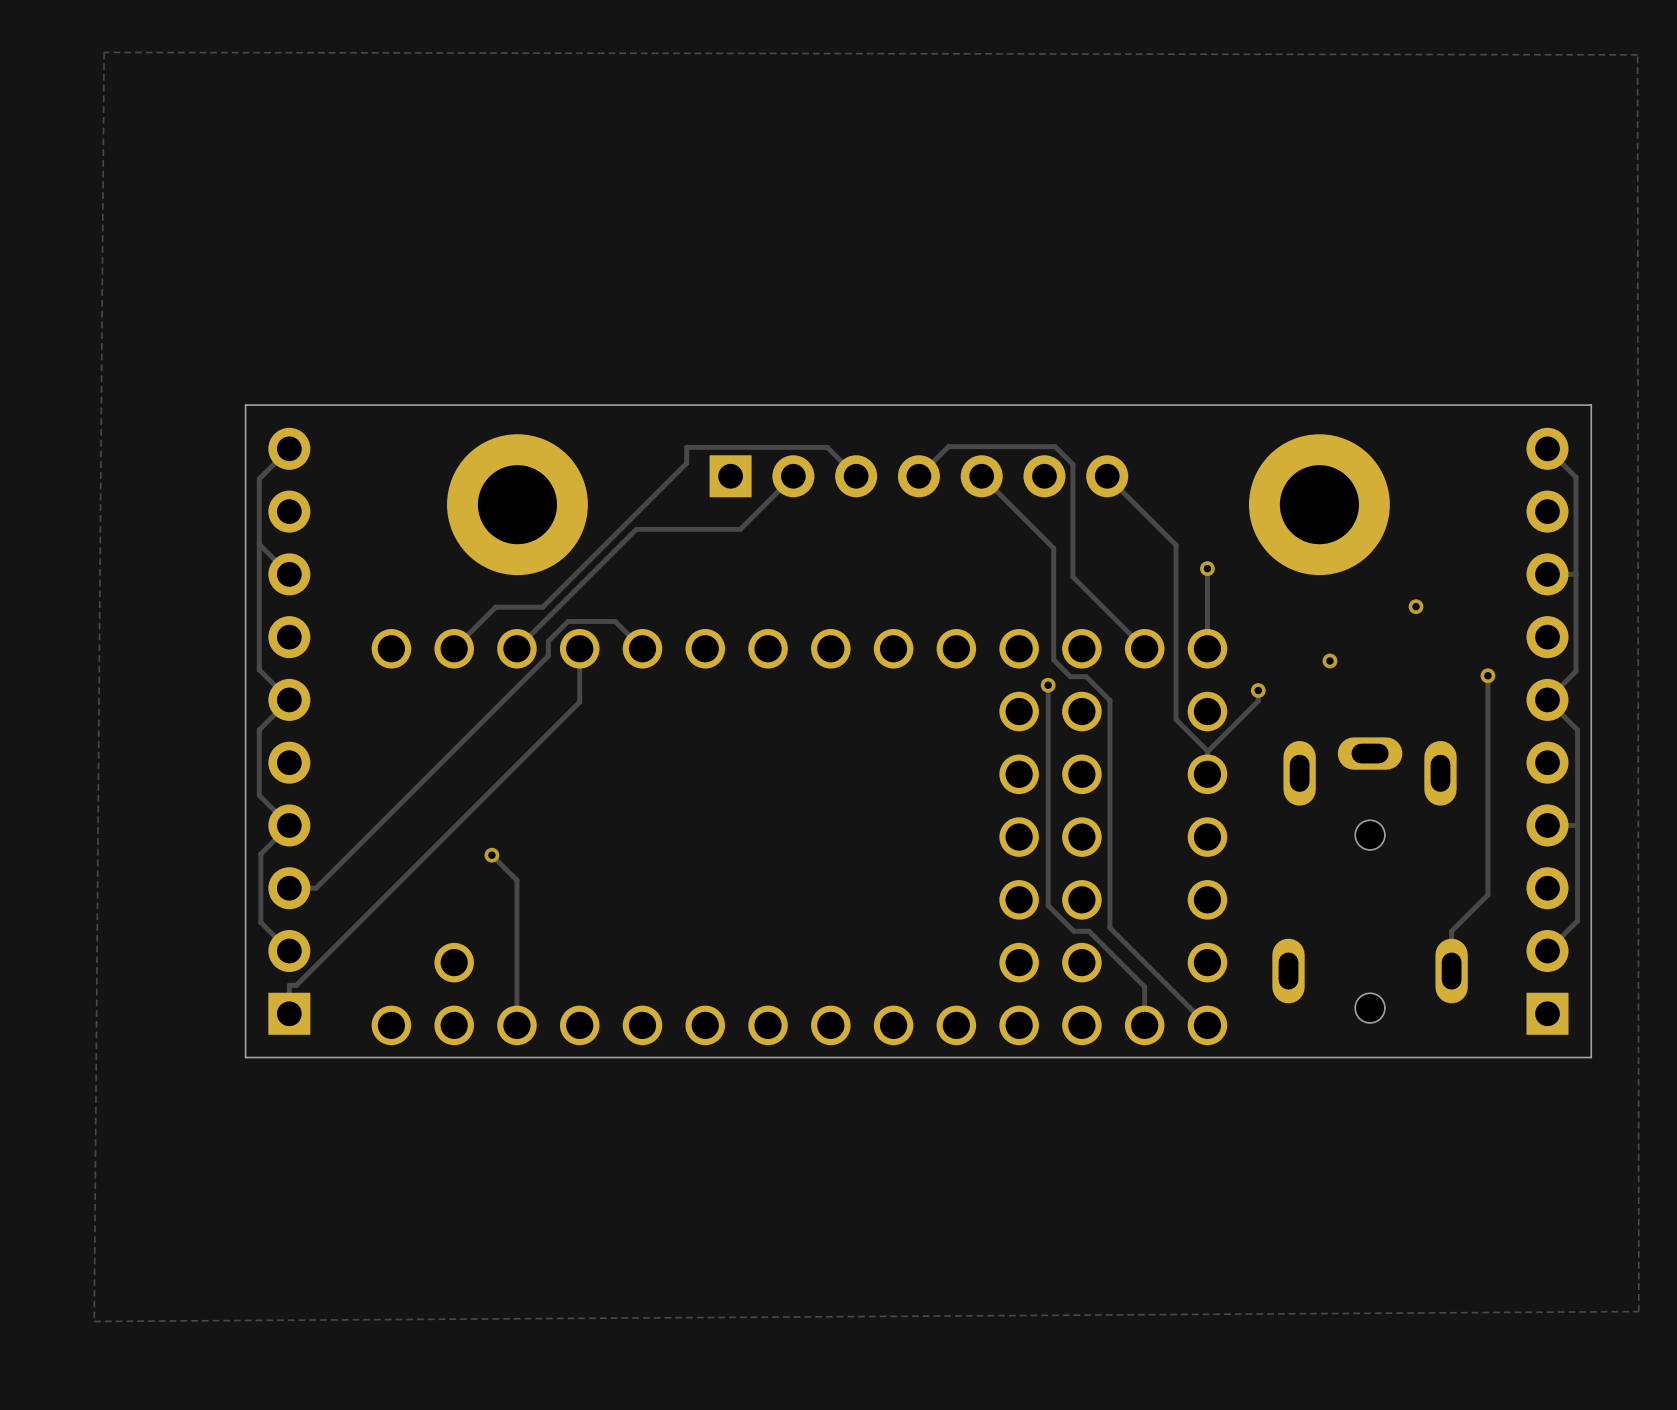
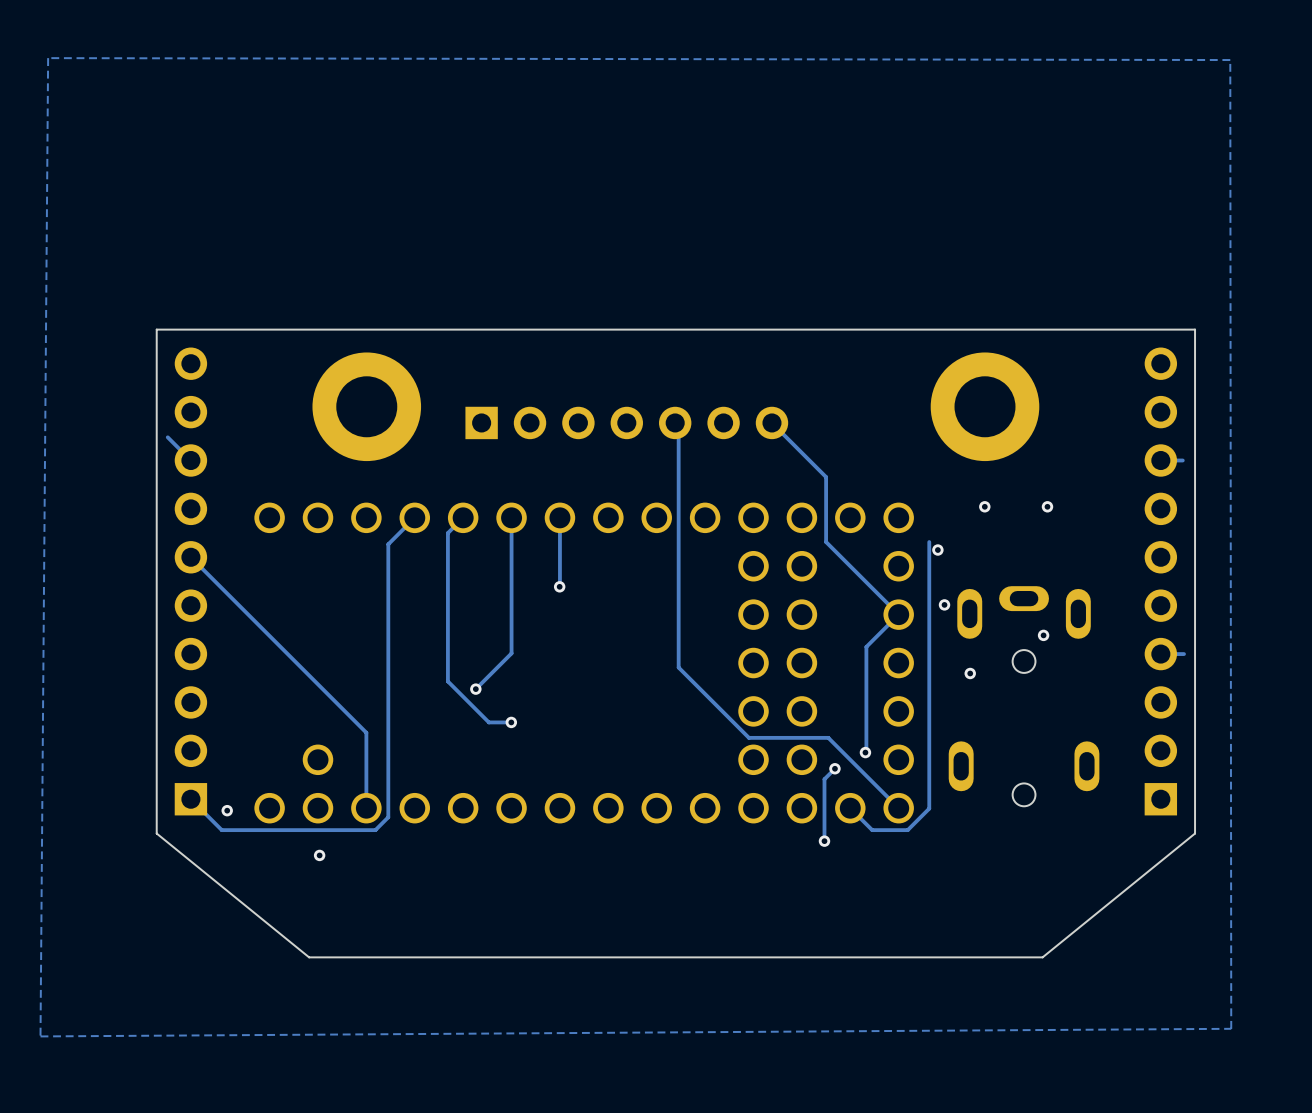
board edge: (1591, 405) (245, 405) (245, 1057) (1591, 1057) (1591, 405) -> (1195, 329) (1195, 833) (1042, 957) (309, 957) (156, 833) (156, 329) (1195, 329)
track: (289, 448) (259, 478) (259, 669) (289, 699) (259, 729) (259, 795) (289, 825) (260, 853) (260, 922) (289, 951) -> none
track: (1547, 448) (1575, 477) (1575, 671) (1547, 699) (1577, 729) (1577, 920) (1547, 951) -> none
track: (793, 476) (740, 529) (636, 529) (516, 648) -> none
track: (856, 476) (827, 447) (686, 447) (686, 463) (542, 607) (495, 607) (454, 648) -> none
track: (918, 476) (948, 446) (1055, 446) (1072, 464) (1072, 577) (1144, 648) -> none
part position: (918, 476) -> (626, 422)
track: (981, 476) (1053, 548) (1053, 659) (1070, 676) (1086, 676) (1109, 700) (1109, 927) (1116, 934) -> (675, 422) (678, 426) (678, 667) (748, 737) (828, 737)
track: (1107, 476) (1176, 545) (1176, 719) (1207, 751) -> none
track: none -> (771, 422) (826, 477) (826, 542) (898, 614) (866, 646) (865, 752)
track: (1207, 568) (1207, 648) -> none
via: (1207, 568) -> none
via position: (1416, 606) -> (1047, 506)
track: (579, 648) (579, 702) (296, 985) (289, 985) (289, 1013) -> (414, 517) (388, 544) (388, 817) (375, 830) (221, 830) (190, 799)
track: (642, 648) (615, 621) (568, 621) (548, 641) (548, 655) (316, 888) (289, 888) -> (463, 517) (447, 533) (447, 681) (488, 722) (511, 722)
track: none -> (511, 517) (511, 653) (475, 689)
track: none -> (559, 517) (559, 586)
via position: (1329, 660) -> (984, 506)
track: (1487, 675) (1487, 894) (1451, 931) (1451, 971) -> none
via: (1487, 675) -> none
track: (1048, 685) (1048, 905) (1073, 931) (1089, 931) (1144, 986) (1144, 1025) -> (929, 542) (929, 808) (907, 830) (872, 830) (850, 808)
via: (1048, 685) -> none
track: (1258, 690) (1258, 701) (1207, 751) -> none
via: none -> (559, 586)
via: none -> (944, 604)
via: none -> (1043, 635)
via: none -> (970, 673)
track: (491, 855) (516, 880) (516, 927) -> (190, 557) (366, 732)
via: (491, 855) -> none
via: none -> (475, 689)
via: none -> (511, 722)
via: none -> (865, 752)
track: none -> (834, 768) (824, 779) (824, 841)
via: none -> (834, 768)
via: none -> (227, 810)
via: none -> (824, 841)
via: none -> (319, 855)

